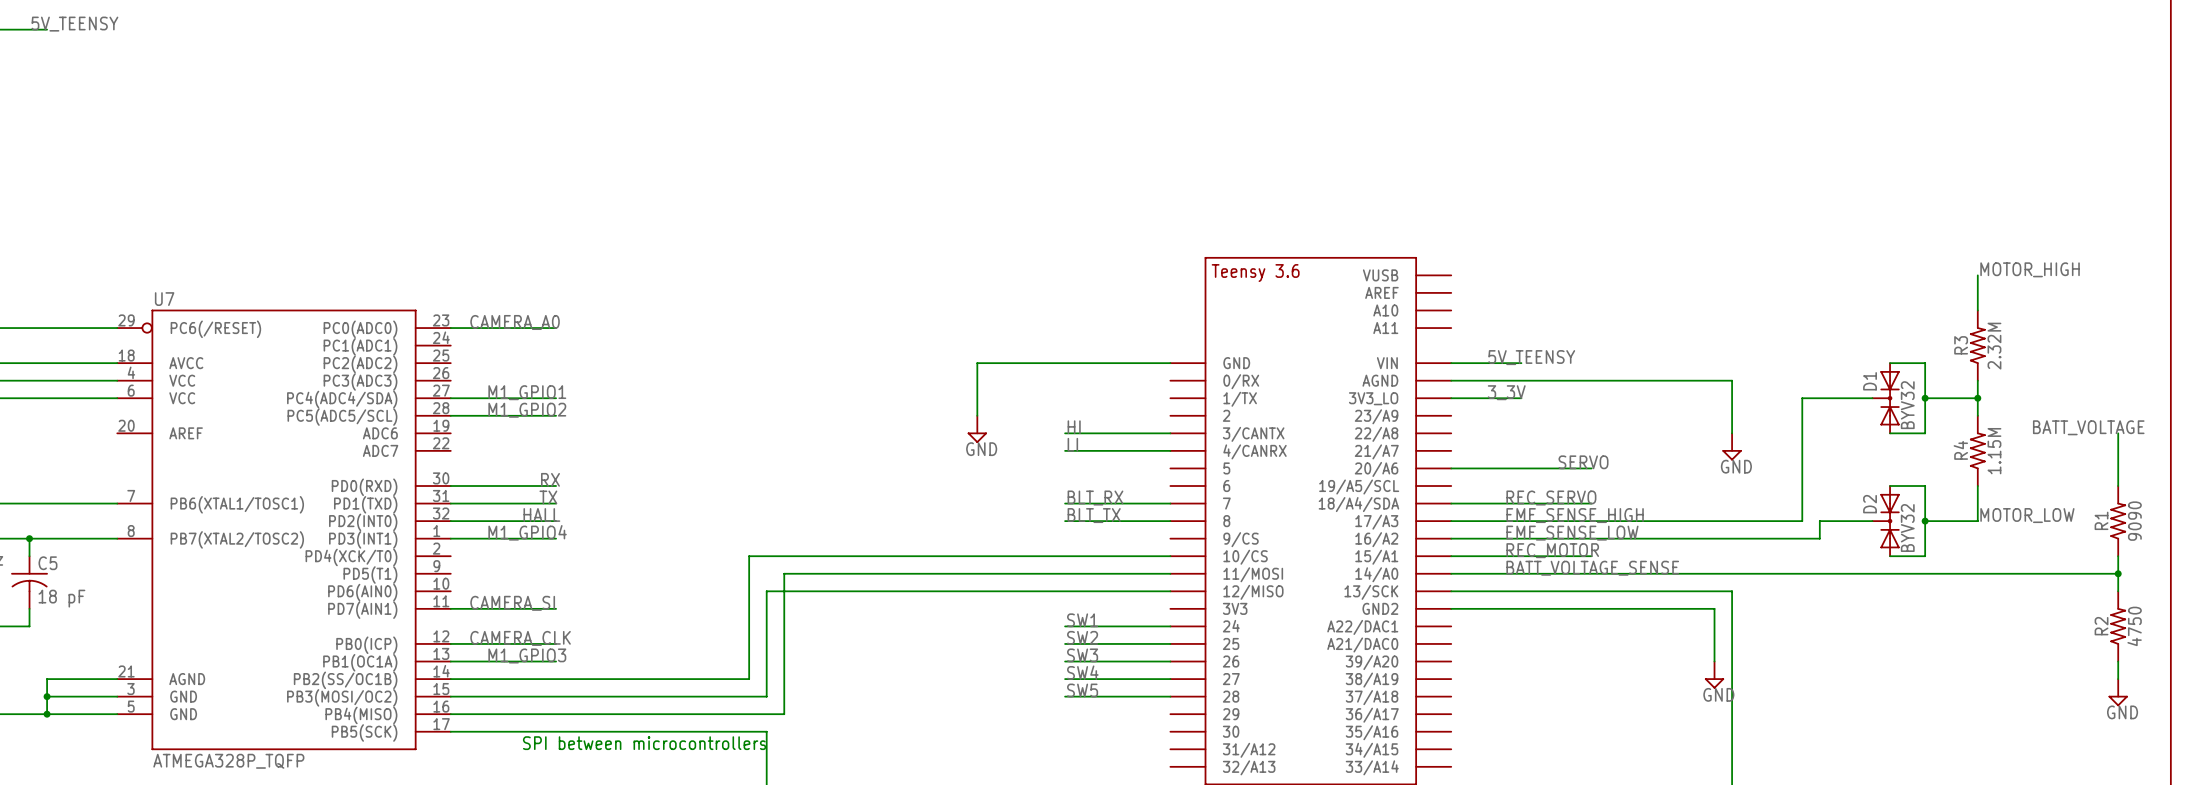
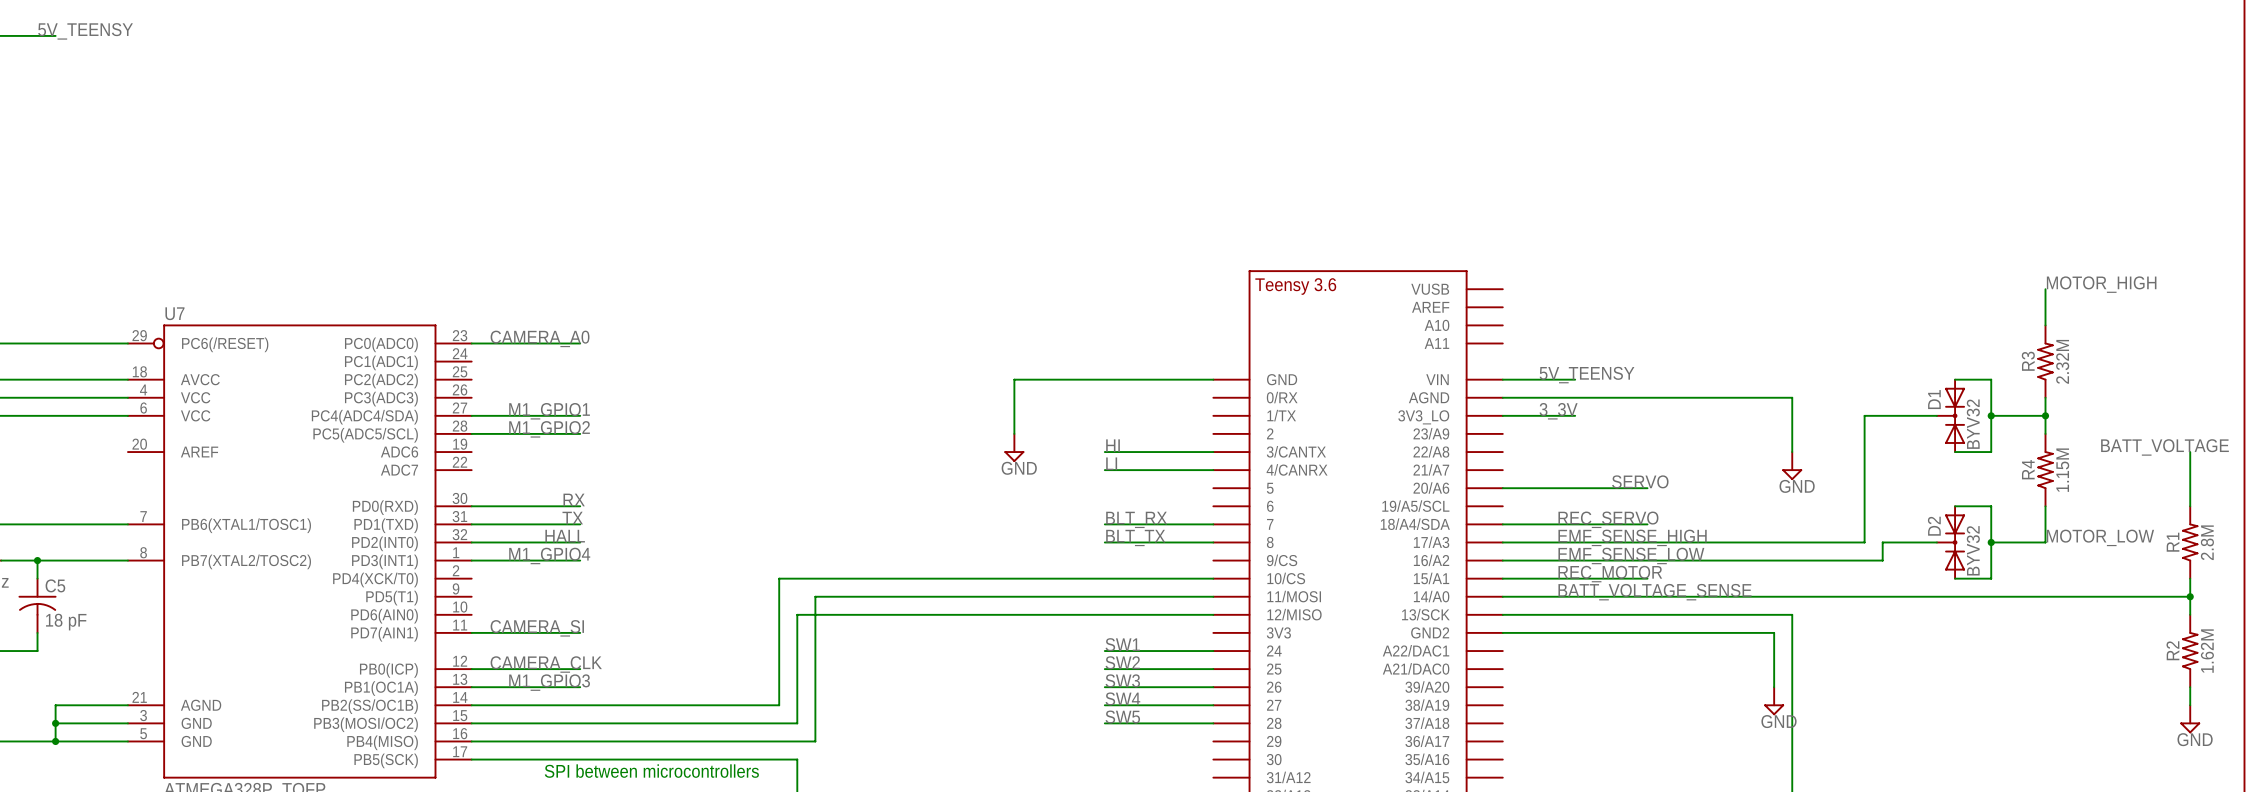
R1 value: 9090 (2134, 521) -> 2.8M (2207, 542)
R2 value: 4750 (2134, 626) -> 1.62M (2207, 651)

